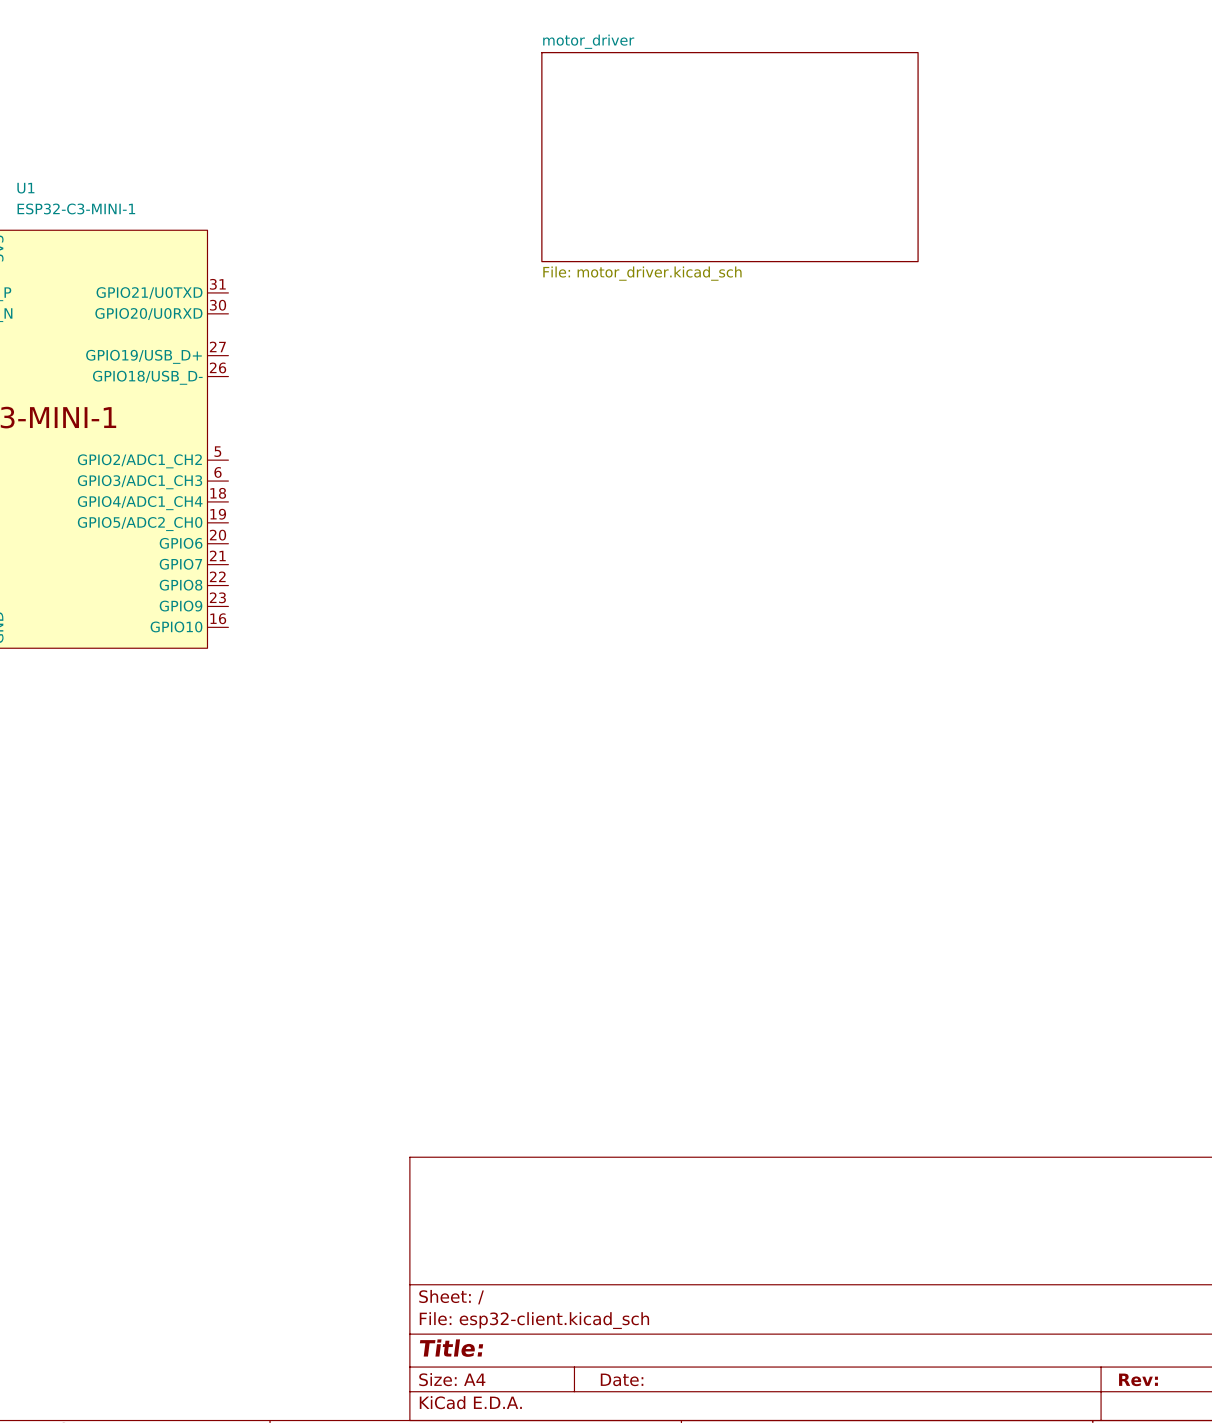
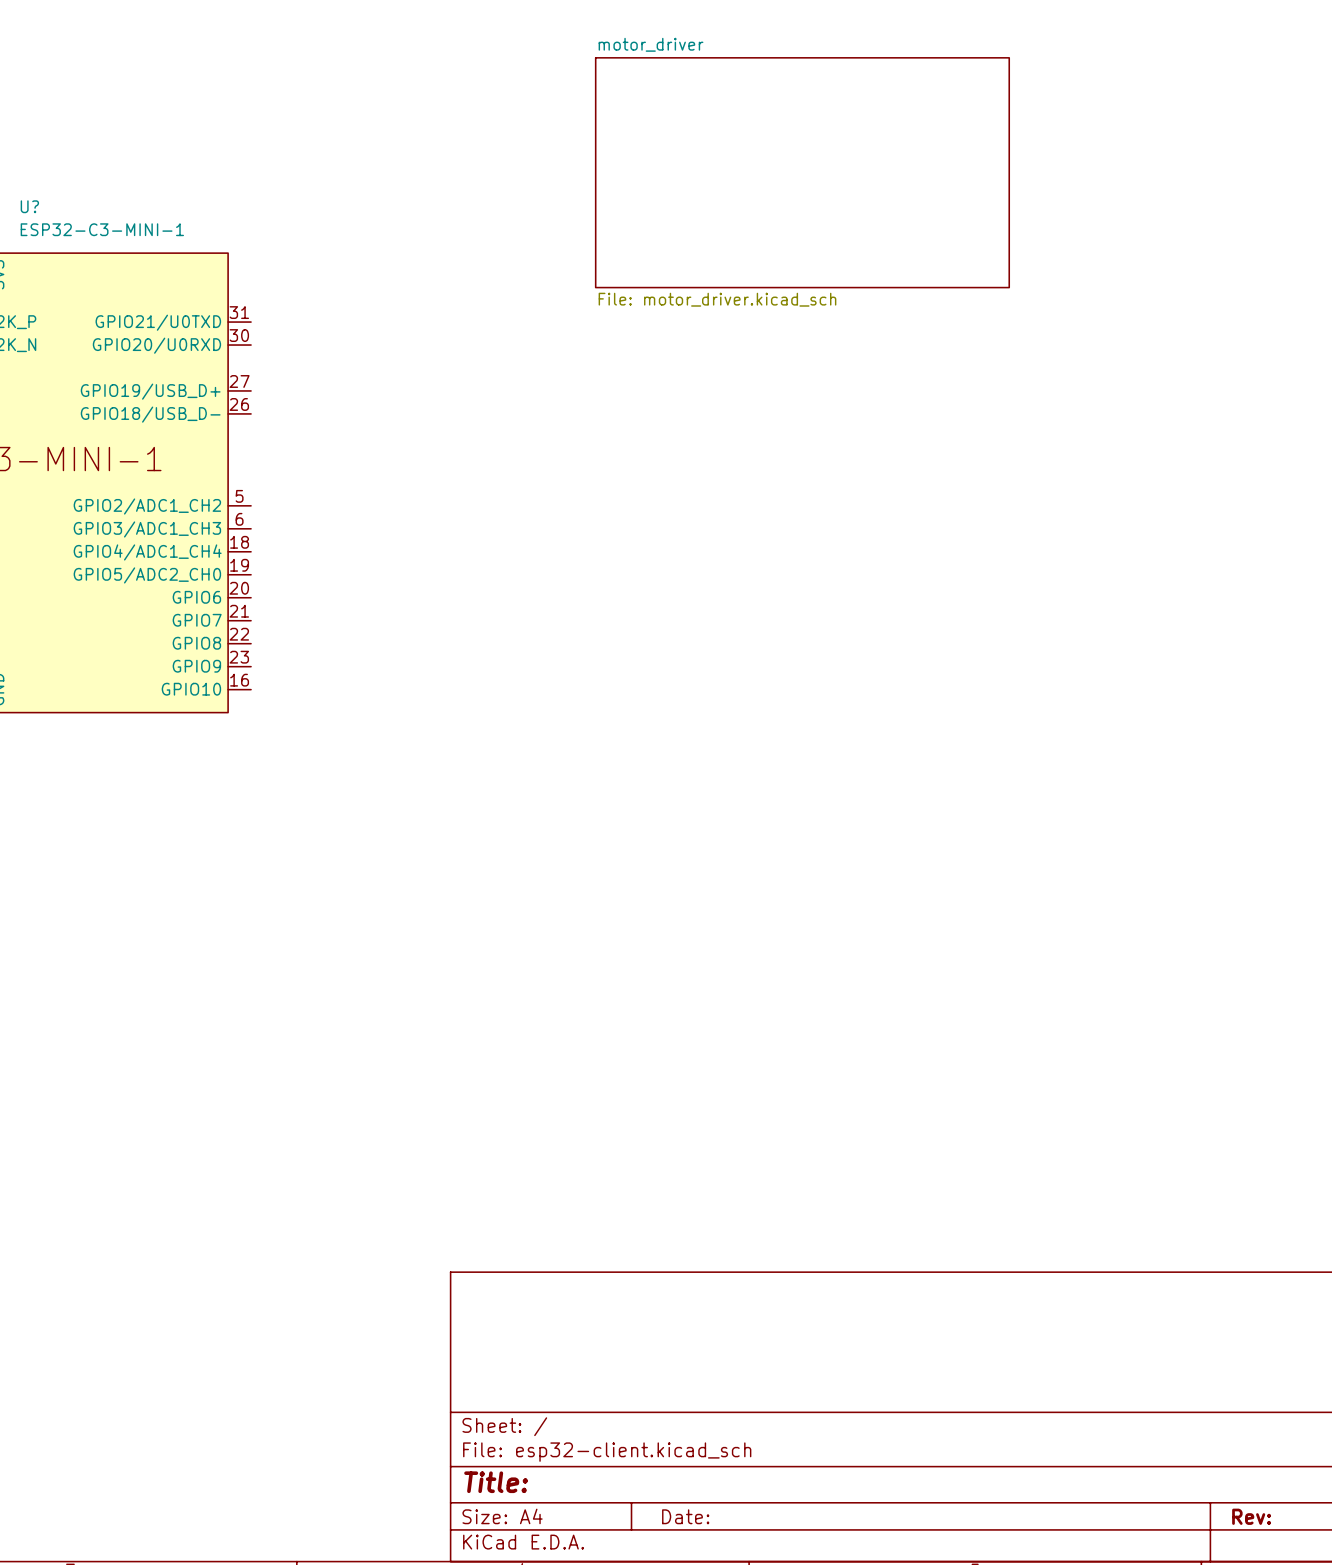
U1 name: U1 (25, 188) -> U? (29, 206)

